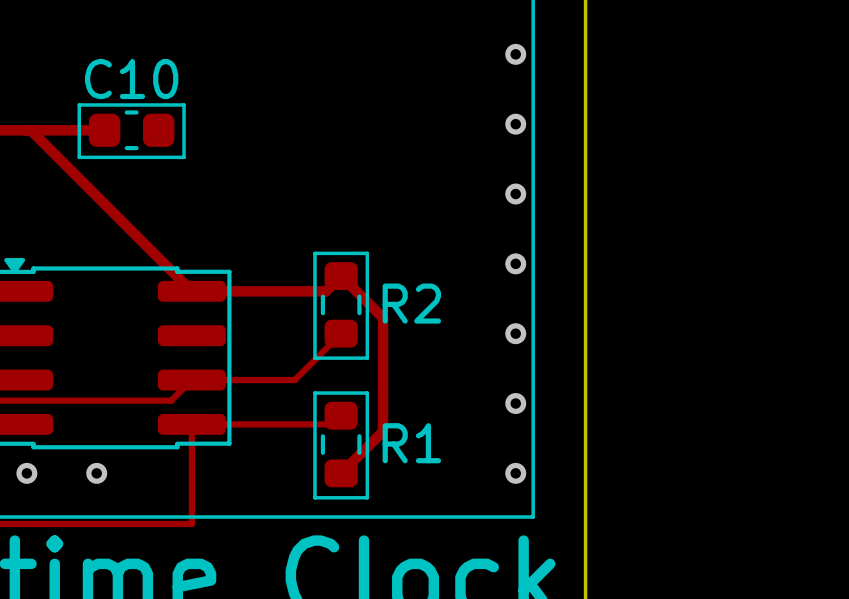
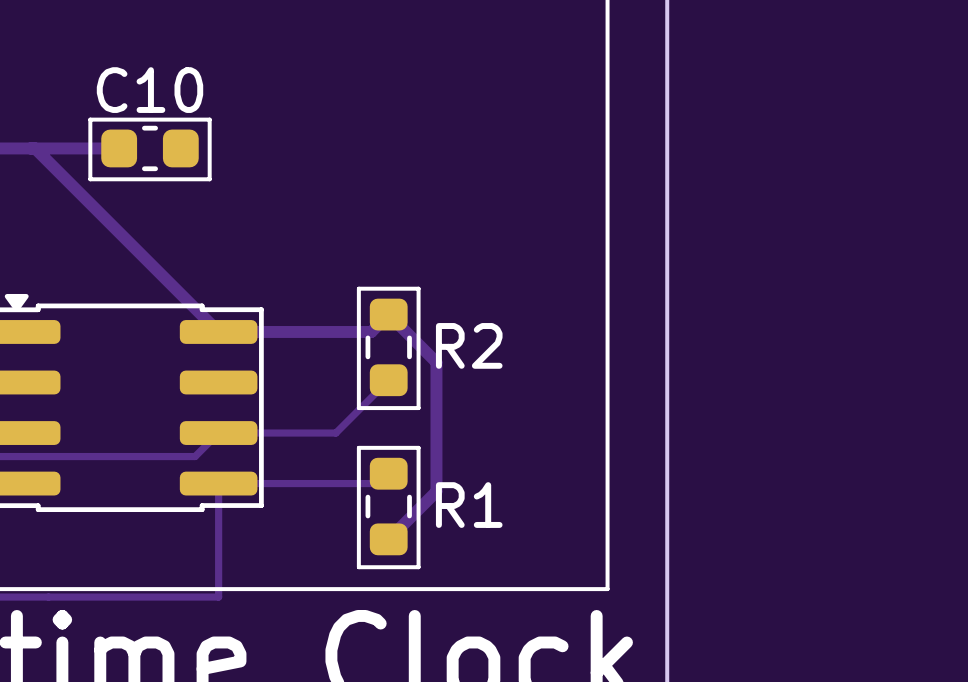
via: (515, 54) -> none
via: (515, 124) -> none
via: (515, 194) -> none
via: (515, 263) -> none
via: (515, 333) -> none
via: (515, 403) -> none
via: (26, 473) -> none
via: (96, 473) -> none
via: (515, 473) -> none

